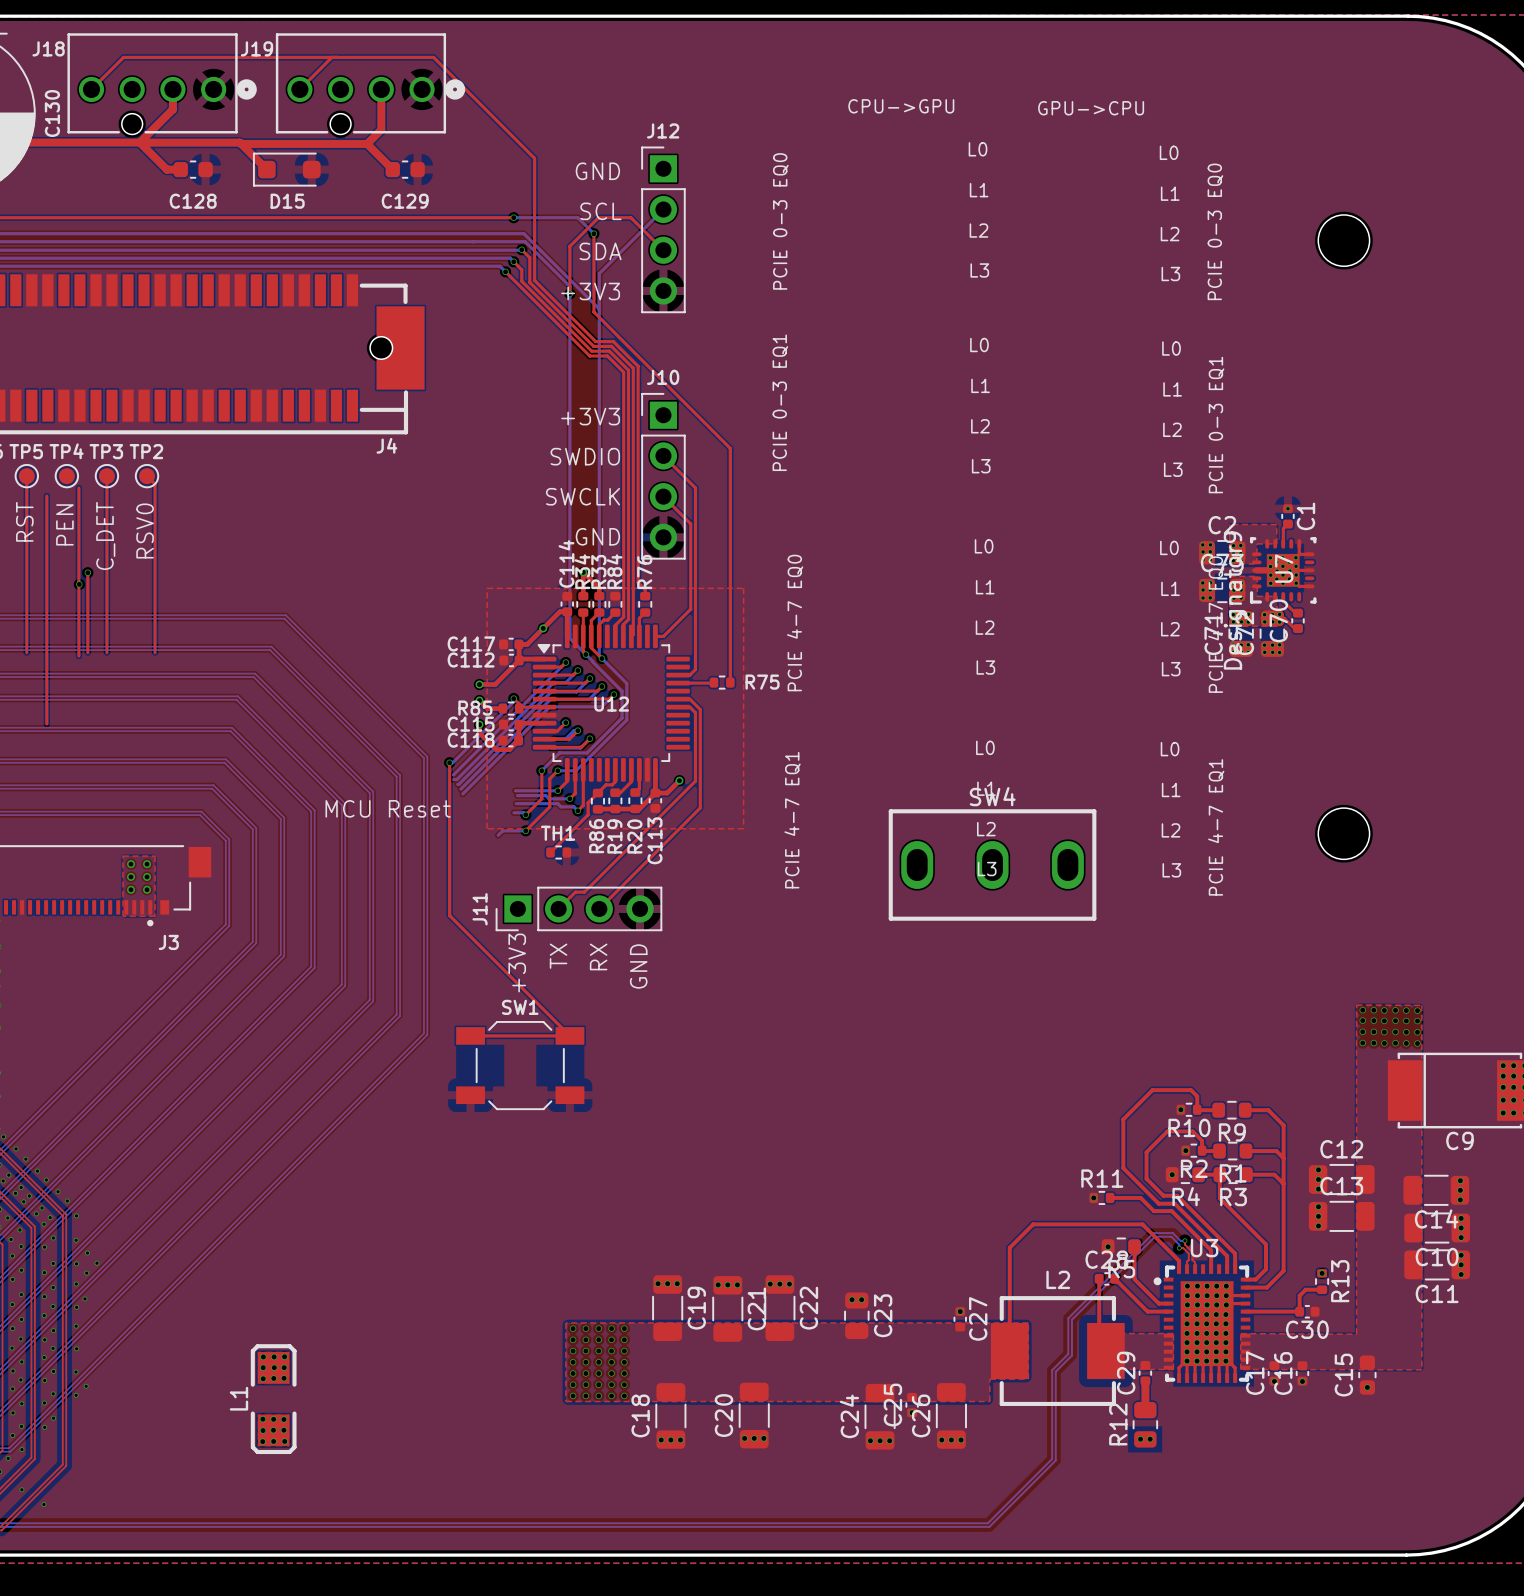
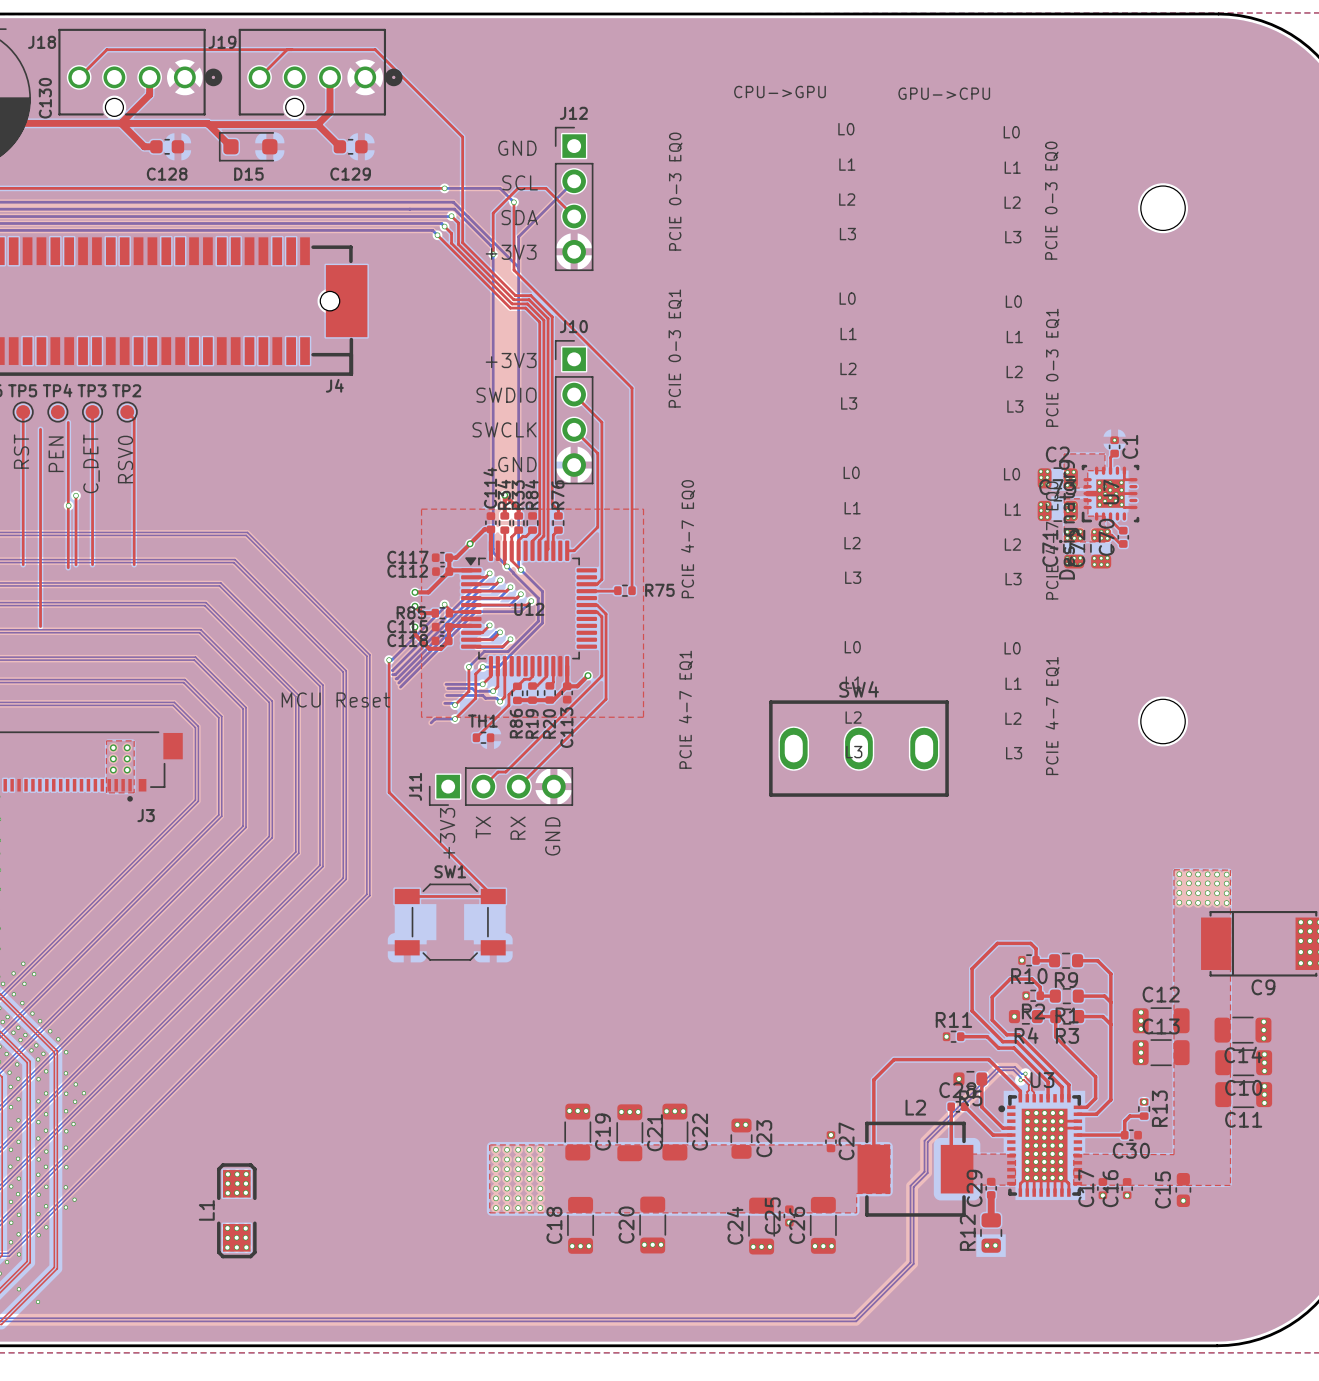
via: none -> (23, 963)
via: none -> (13, 973)
via: none -> (34, 974)
via: none -> (24, 983)

